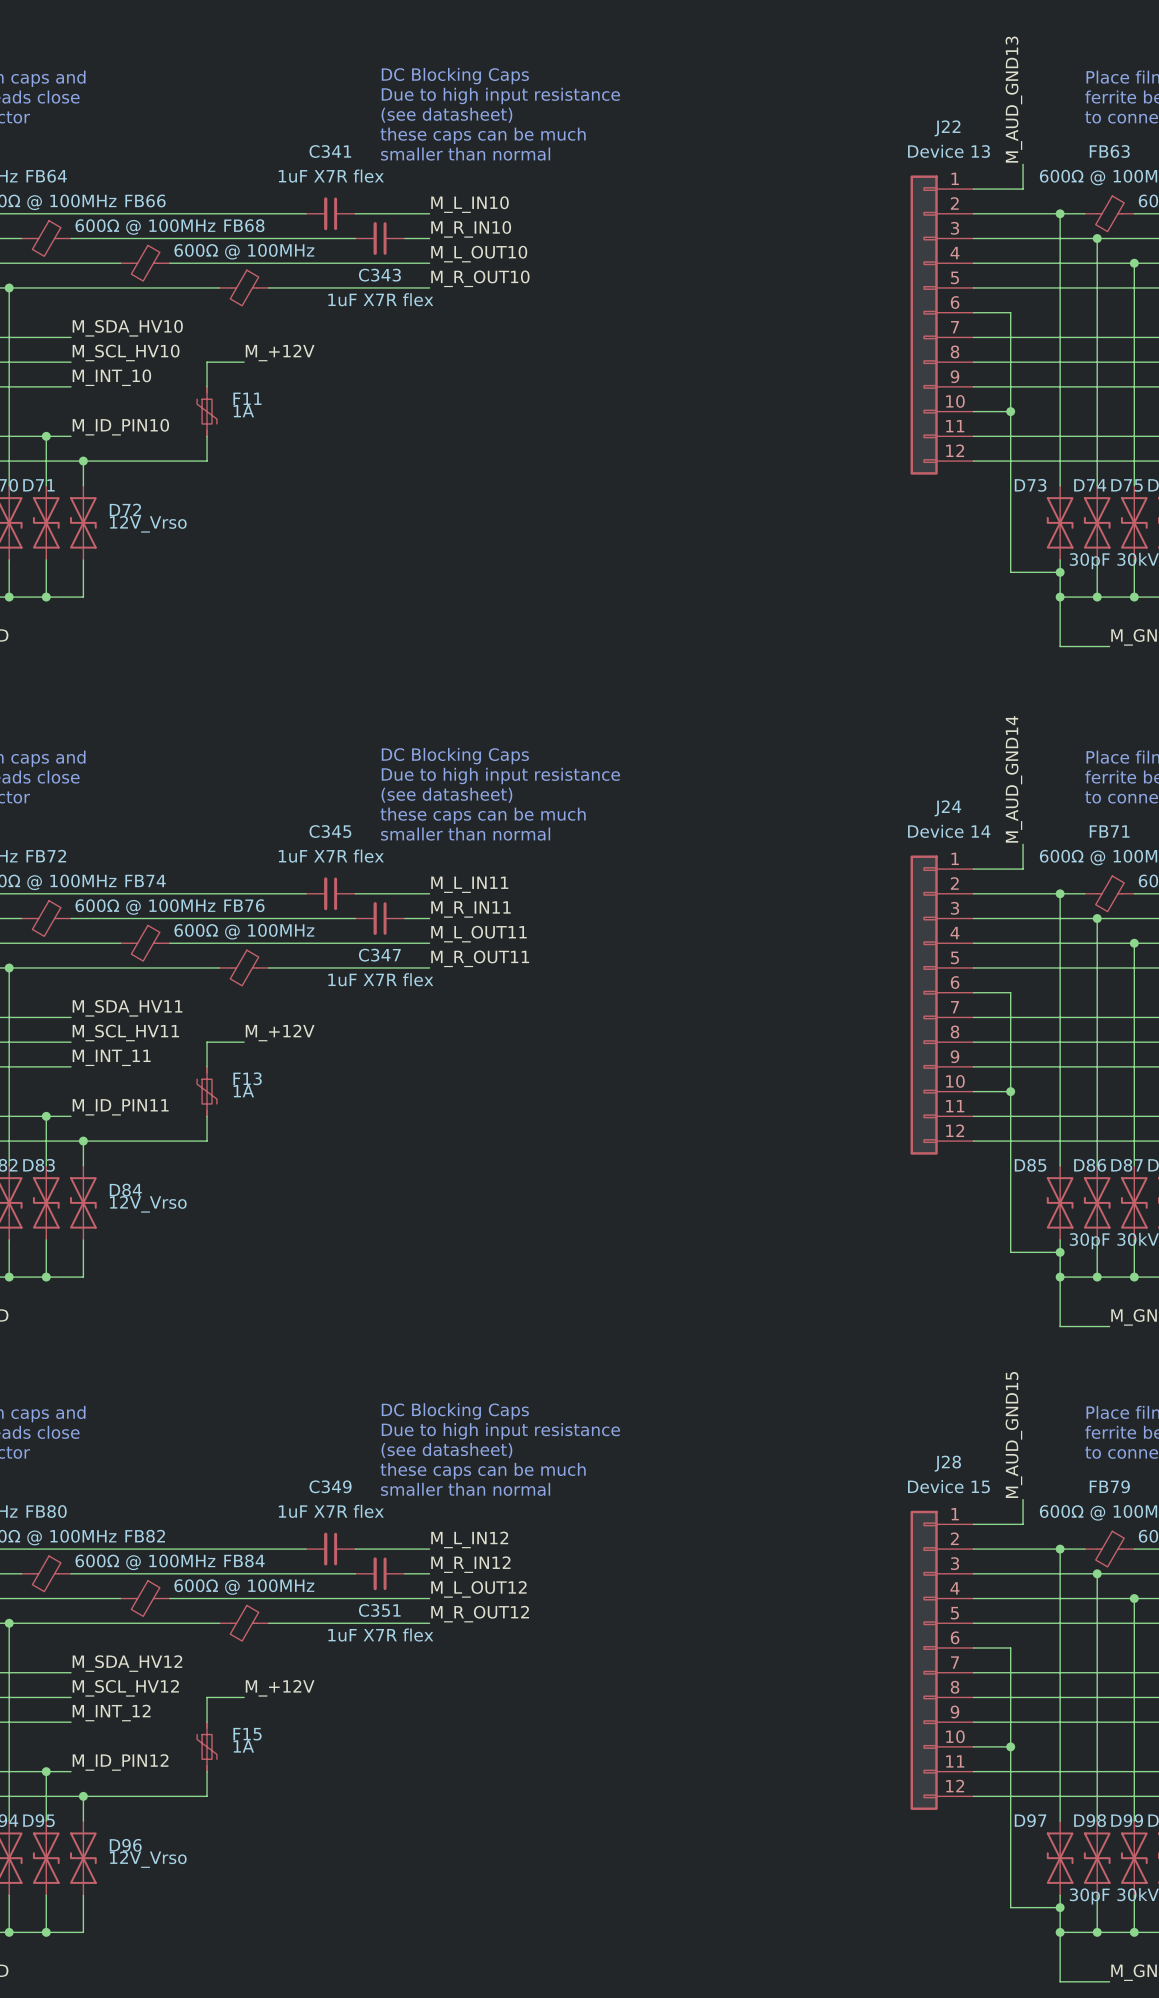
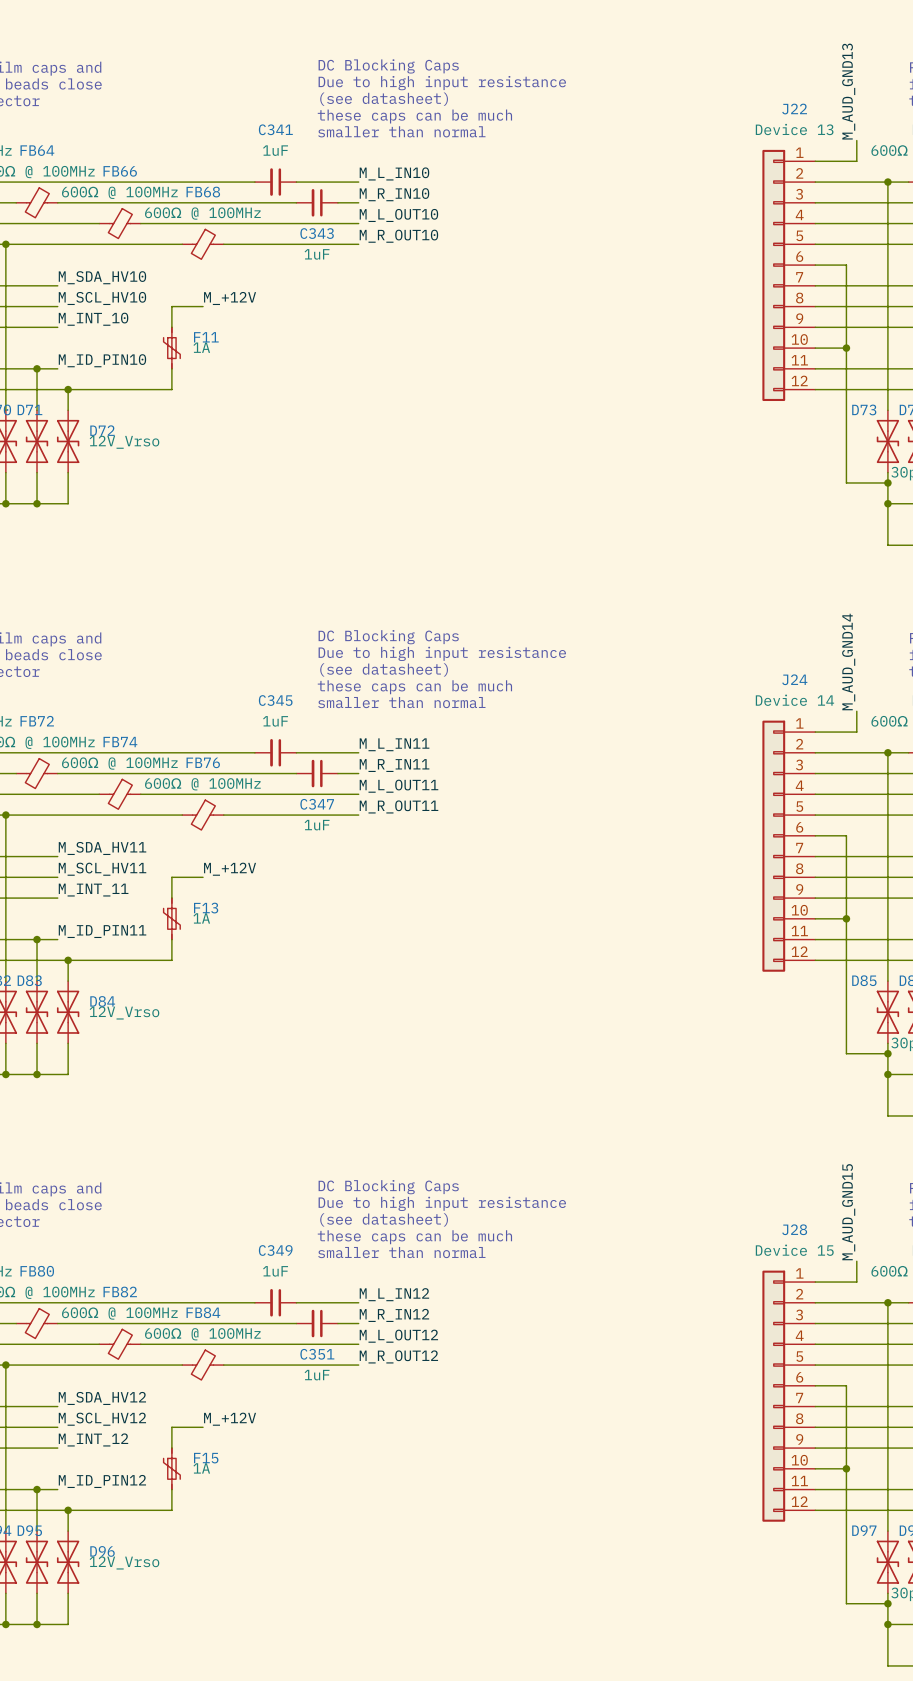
C341 value: 1uF X7R flex (331, 176) -> 1uF (275, 150)
C343 value: 1uF X7R flex (380, 299) -> 1uF (317, 254)
C345 value: 1uF X7R flex (331, 856) -> 1uF (275, 721)
C347 value: 1uF X7R flex (380, 979) -> 1uF (317, 825)
C349 value: 1uF X7R flex (331, 1511) -> 1uF (275, 1271)
C351 value: 1uF X7R flex (380, 1635) -> 1uF (317, 1375)

